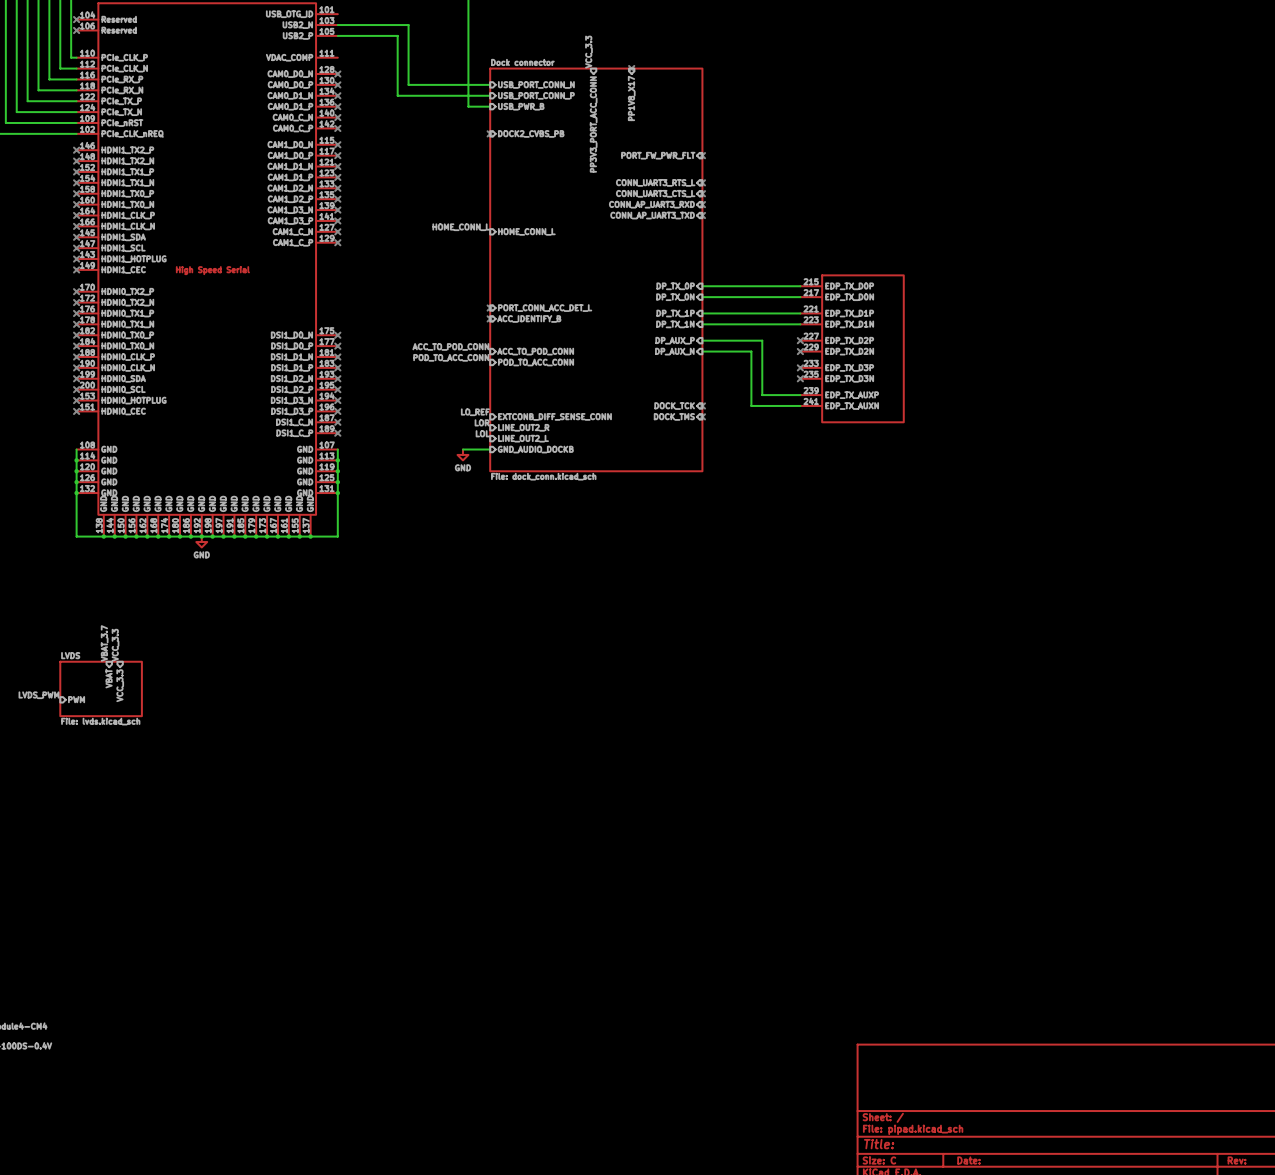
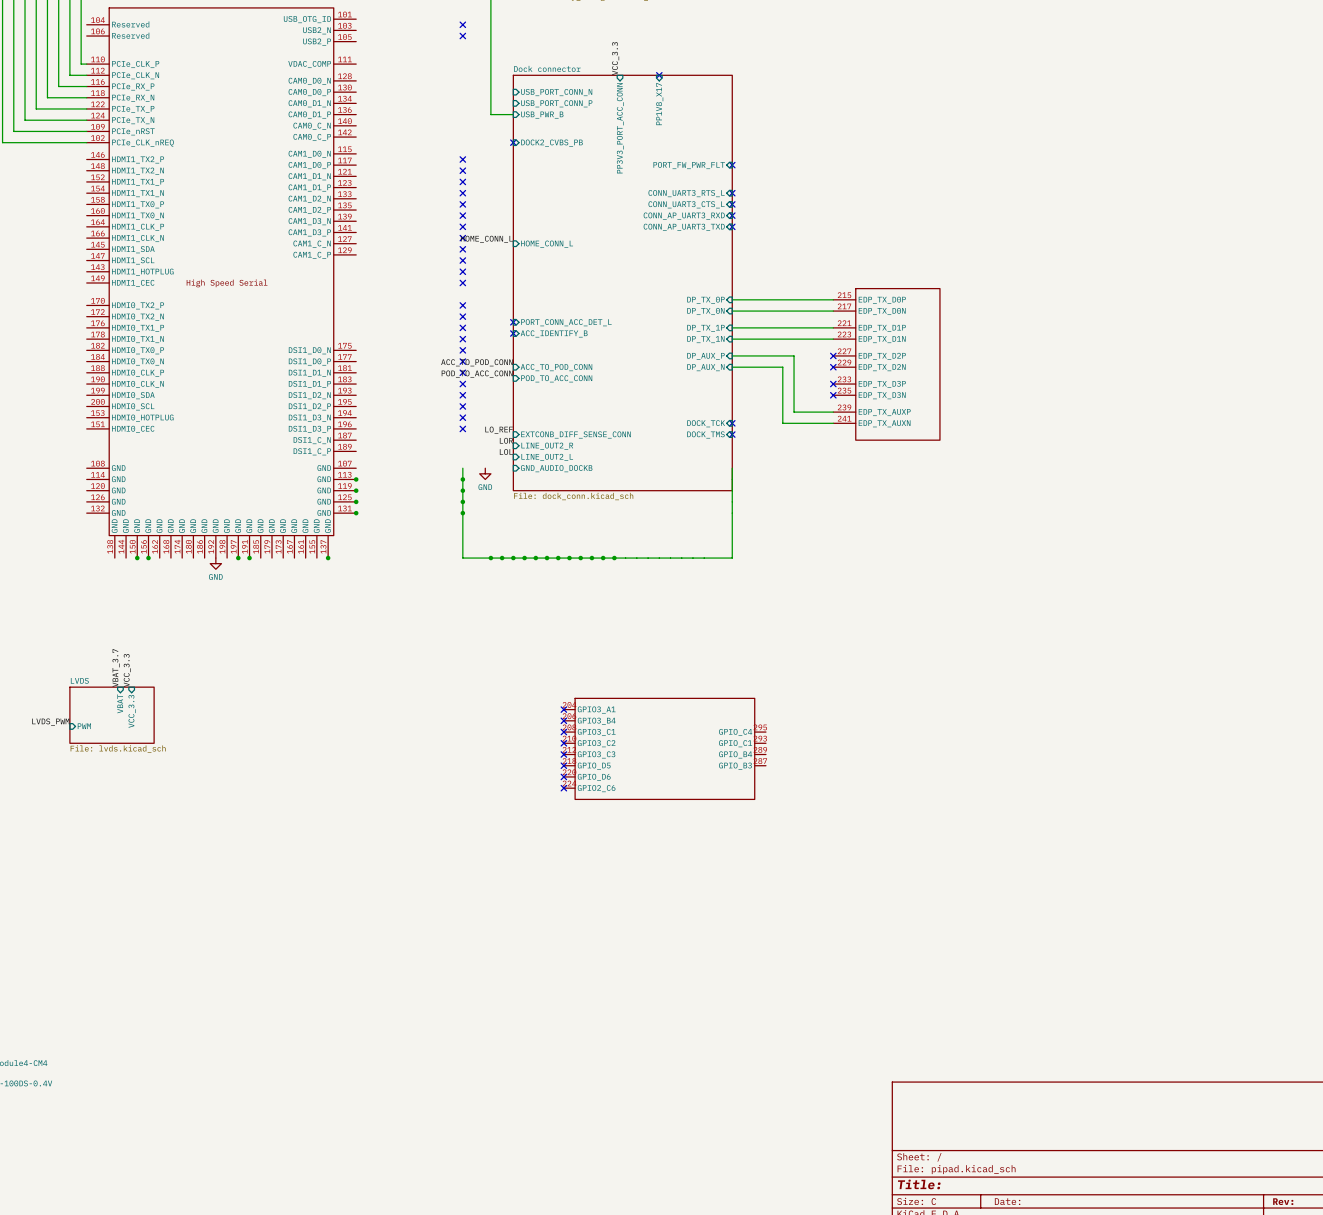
no-connect mark: (76, 19) -> none
no-connect mark: none -> (462, 24)
wire: (337, 25) (408, 25) (408, 84) (490, 84) -> none
no-connect mark: (76, 30) -> none
no-connect mark: none -> (462, 36)
wire: (337, 35) (397, 35) (397, 95) (490, 95) -> none
no-connect mark: (337, 74) -> none
no-connect mark: (337, 84) -> none
no-connect mark: (337, 95) -> none
no-connect mark: (337, 106) -> none
no-connect mark: (337, 117) -> none
no-connect mark: (337, 128) -> none
no-connect mark: (337, 144) -> none
no-connect mark: (76, 150) -> none
no-connect mark: none -> (462, 159)
no-connect mark: (337, 155) -> none
no-connect mark: (76, 161) -> none
no-connect mark: none -> (462, 170)
no-connect mark: (337, 166) -> none
no-connect mark: (76, 171) -> none
no-connect mark: none -> (462, 181)
no-connect mark: (337, 177) -> none
no-connect mark: (76, 182) -> none
no-connect mark: none -> (462, 193)
no-connect mark: (337, 188) -> none
no-connect mark: (76, 193) -> none
no-connect mark: none -> (462, 204)
no-connect mark: (337, 199) -> none
no-connect mark: (76, 204) -> none
no-connect mark: none -> (462, 215)
no-connect mark: (337, 210) -> none
no-connect mark: (76, 215) -> none
no-connect mark: none -> (462, 226)
no-connect mark: (337, 220) -> none
no-connect mark: (76, 226) -> none
no-connect mark: none -> (462, 238)
no-connect mark: (337, 231) -> none
no-connect mark: (76, 237) -> none
no-connect mark: none -> (462, 249)
no-connect mark: (337, 242) -> none
no-connect mark: (76, 248) -> none
no-connect mark: none -> (462, 260)
no-connect mark: (76, 259) -> none
no-connect mark: none -> (462, 271)
no-connect mark: (76, 269) -> none
no-connect mark: none -> (462, 282)
no-connect mark: (76, 291) -> none
no-connect mark: none -> (462, 305)
no-connect mark: (76, 302) -> none
no-connect mark: none -> (462, 316)
no-connect mark: (76, 313) -> none
no-connect mark: none -> (462, 327)
no-connect mark: (76, 324) -> none
no-connect mark: none -> (462, 339)
no-connect mark: (76, 335) -> none
no-connect mark: (337, 335) -> none
no-connect mark: none -> (462, 350)
no-connect mark: (76, 346) -> none
no-connect mark: (337, 346) -> none
no-connect mark: none -> (462, 361)
no-connect mark: (76, 356) -> none
no-connect mark: (337, 356) -> none
no-connect mark: none -> (462, 372)
no-connect mark: (76, 367) -> none
no-connect mark: (337, 367) -> none
no-connect mark: none -> (462, 384)
no-connect mark: (76, 378) -> none
no-connect mark: (337, 378) -> none
no-connect mark: none -> (462, 395)
no-connect mark: (76, 389) -> none
no-connect mark: (337, 389) -> none
no-connect mark: none -> (462, 406)
no-connect mark: (76, 400) -> none
no-connect mark: (337, 400) -> none
no-connect mark: none -> (462, 417)
no-connect mark: (76, 411) -> none
no-connect mark: (337, 411) -> none
no-connect mark: none -> (462, 428)
no-connect mark: (337, 422) -> none
no-connect mark: (337, 433) -> none
wire: (76, 449) (76, 536) (337, 536) (337, 449) -> none
wire: none -> (462, 468) (462, 558) (732, 558) (732, 468)
wire: (462, 449) (490, 449) -> none
junction: (76, 460) -> none
junction: none -> (462, 479)
junction: (76, 471) -> none
junction: none -> (462, 490)
junction: (76, 482) -> none
junction: none -> (462, 501)
junction: (76, 493) -> none
junction: none -> (462, 513)
junction: (103, 536) -> none
junction: (114, 536) -> none
junction: (147, 536) -> none
junction: (158, 536) -> none
junction: (169, 536) -> none
junction: (180, 536) -> none
junction: (190, 536) -> none
junction: (201, 536) -> none
junction: (212, 536) -> none
junction: (245, 536) -> none
junction: (256, 536) -> none
junction: (267, 536) -> none
junction: (277, 536) -> none
junction: (288, 536) -> none
junction: (299, 536) -> none
junction: none -> (490, 558)
junction: none -> (502, 558)
junction: none -> (513, 558)
junction: none -> (524, 558)
junction: none -> (535, 558)
junction: none -> (547, 558)
junction: none -> (558, 558)
junction: none -> (569, 558)
junction: none -> (580, 558)
junction: none -> (591, 558)
junction: none -> (603, 558)
junction: none -> (614, 558)
no-connect mark: none -> (563, 709)
no-connect mark: none -> (563, 720)
no-connect mark: none -> (563, 732)
no-connect mark: none -> (563, 743)
part: none -> (664, 748)
no-connect mark: none -> (563, 754)
no-connect mark: none -> (563, 765)
no-connect mark: none -> (563, 776)
no-connect mark: none -> (563, 788)

